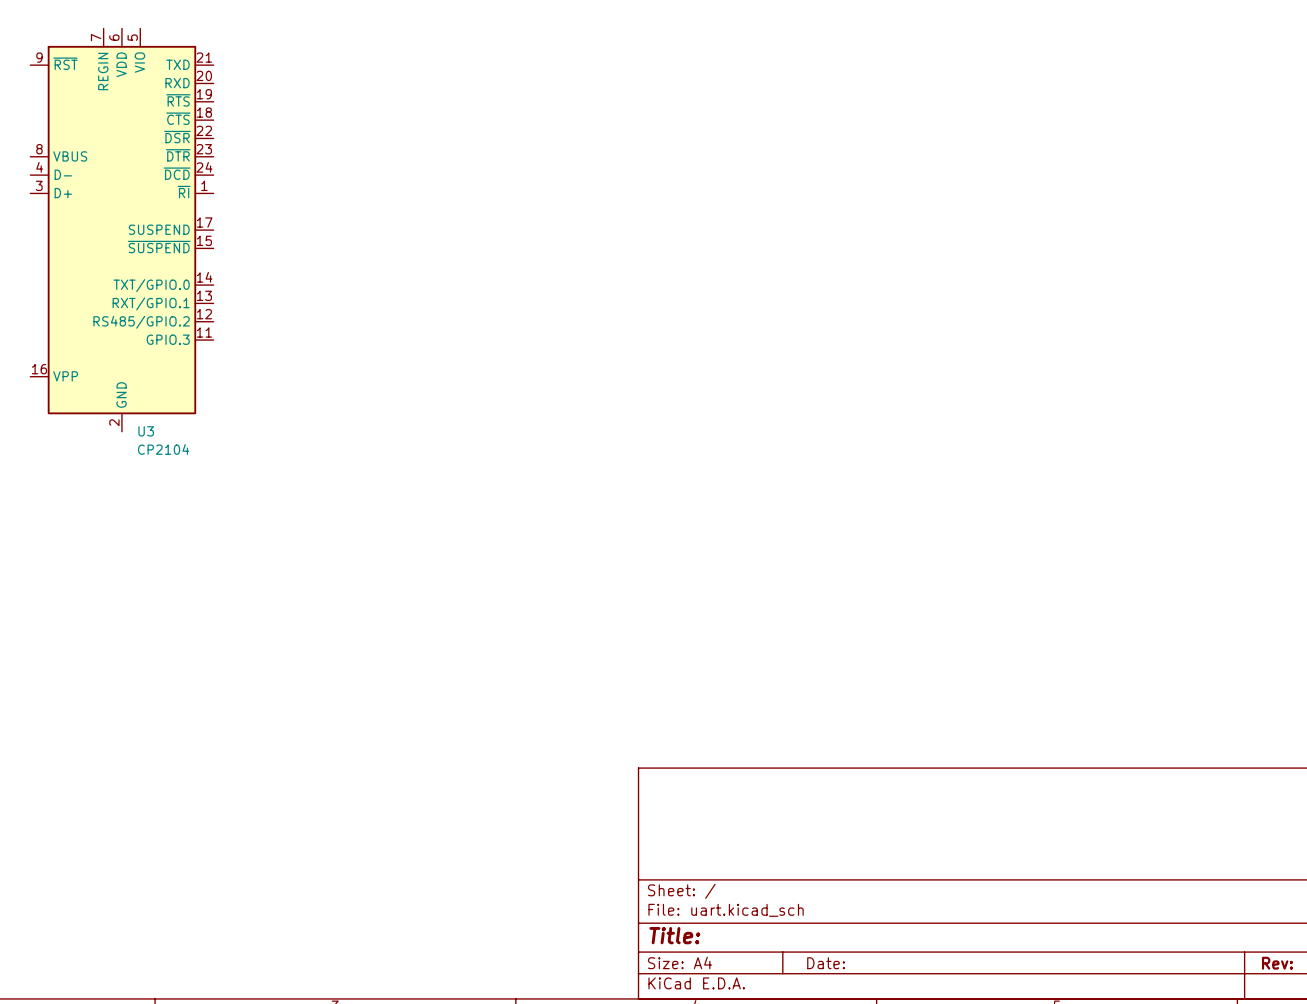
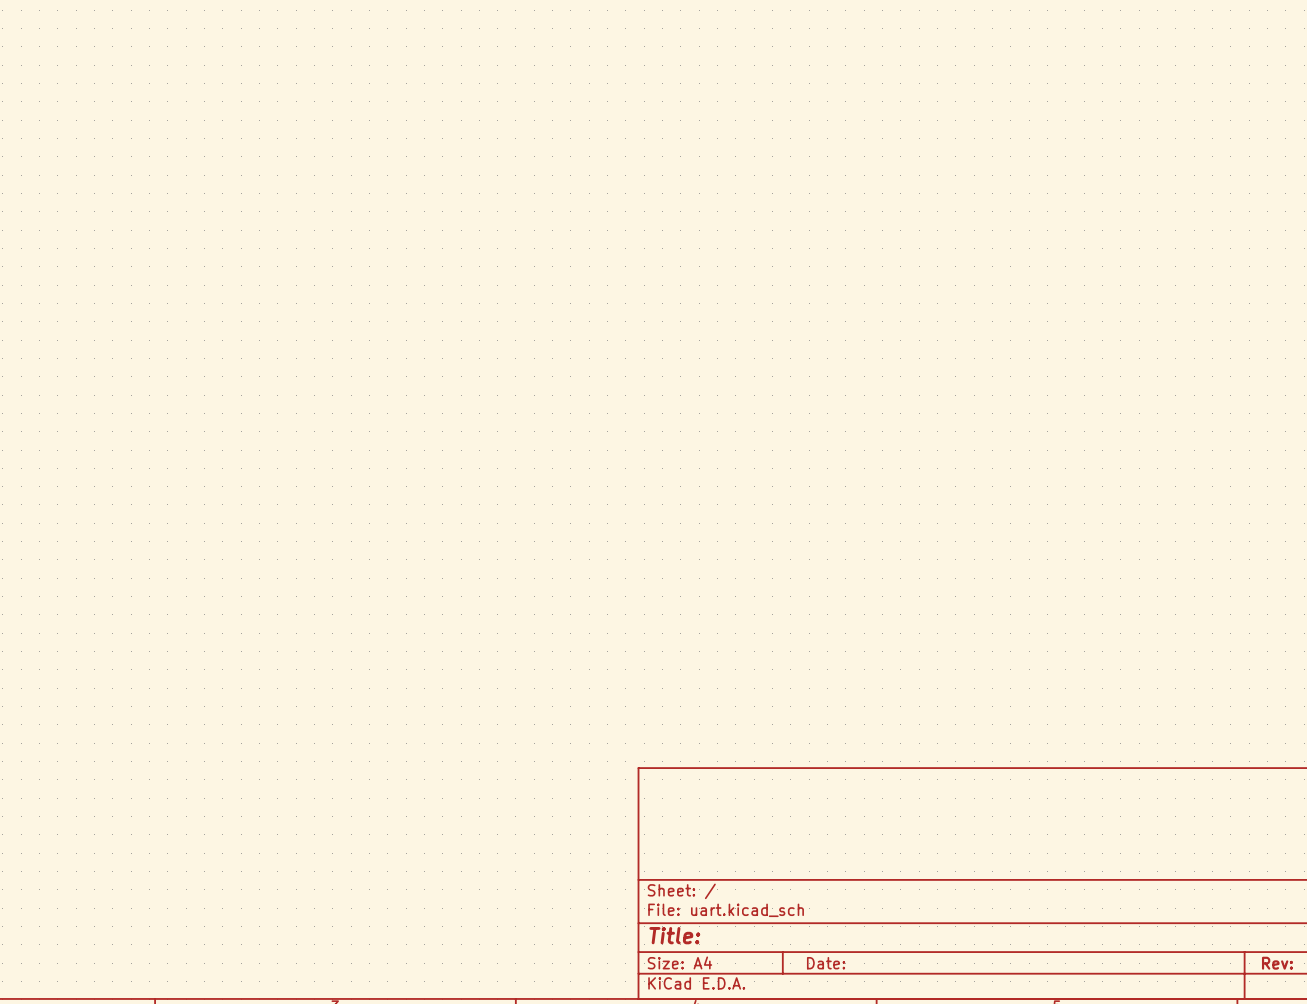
U3: CP2104 (121, 230) -> none

